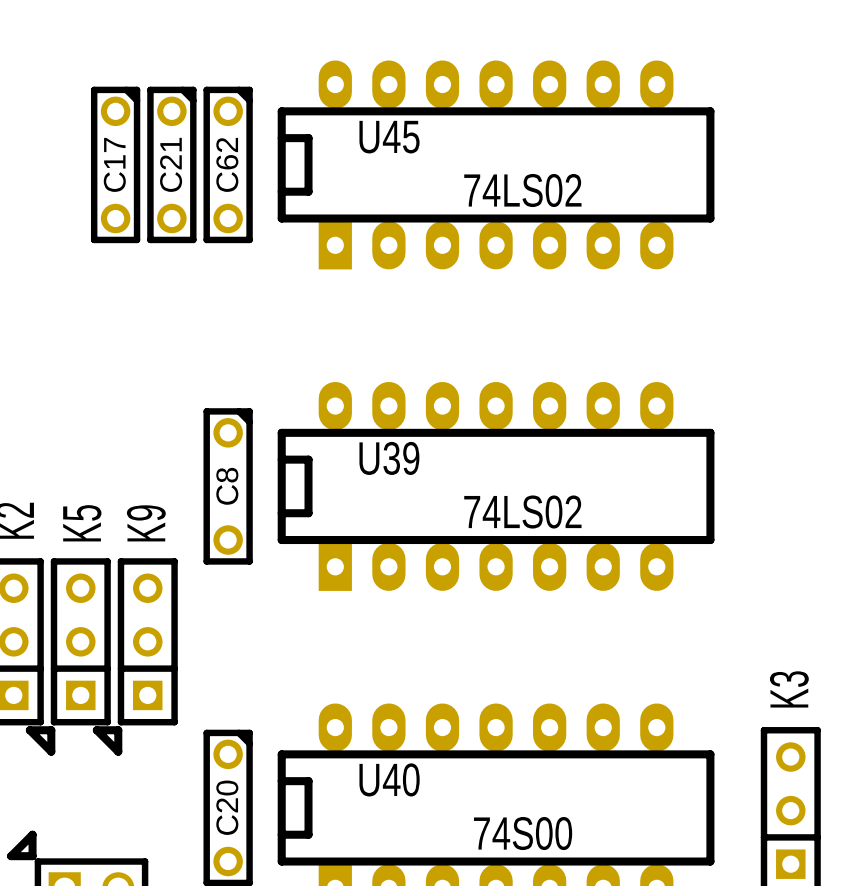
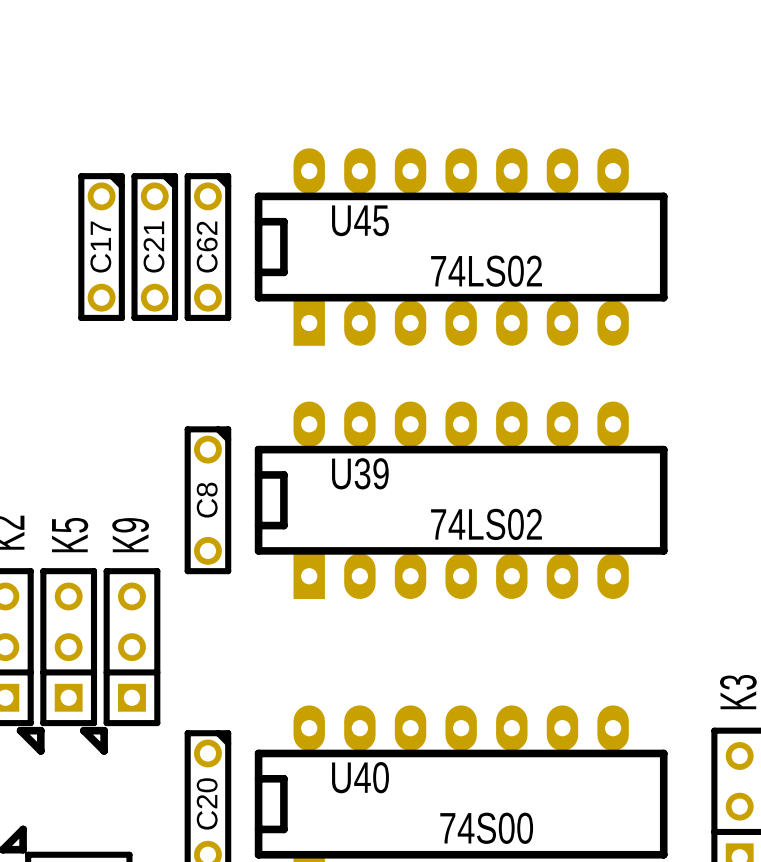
C17 position: (115, 164) -> (101, 247)
C21 position: (171, 164) -> (154, 247)
C62 position: (228, 164) -> (207, 247)
U45 position: (496, 164) -> (461, 247)

